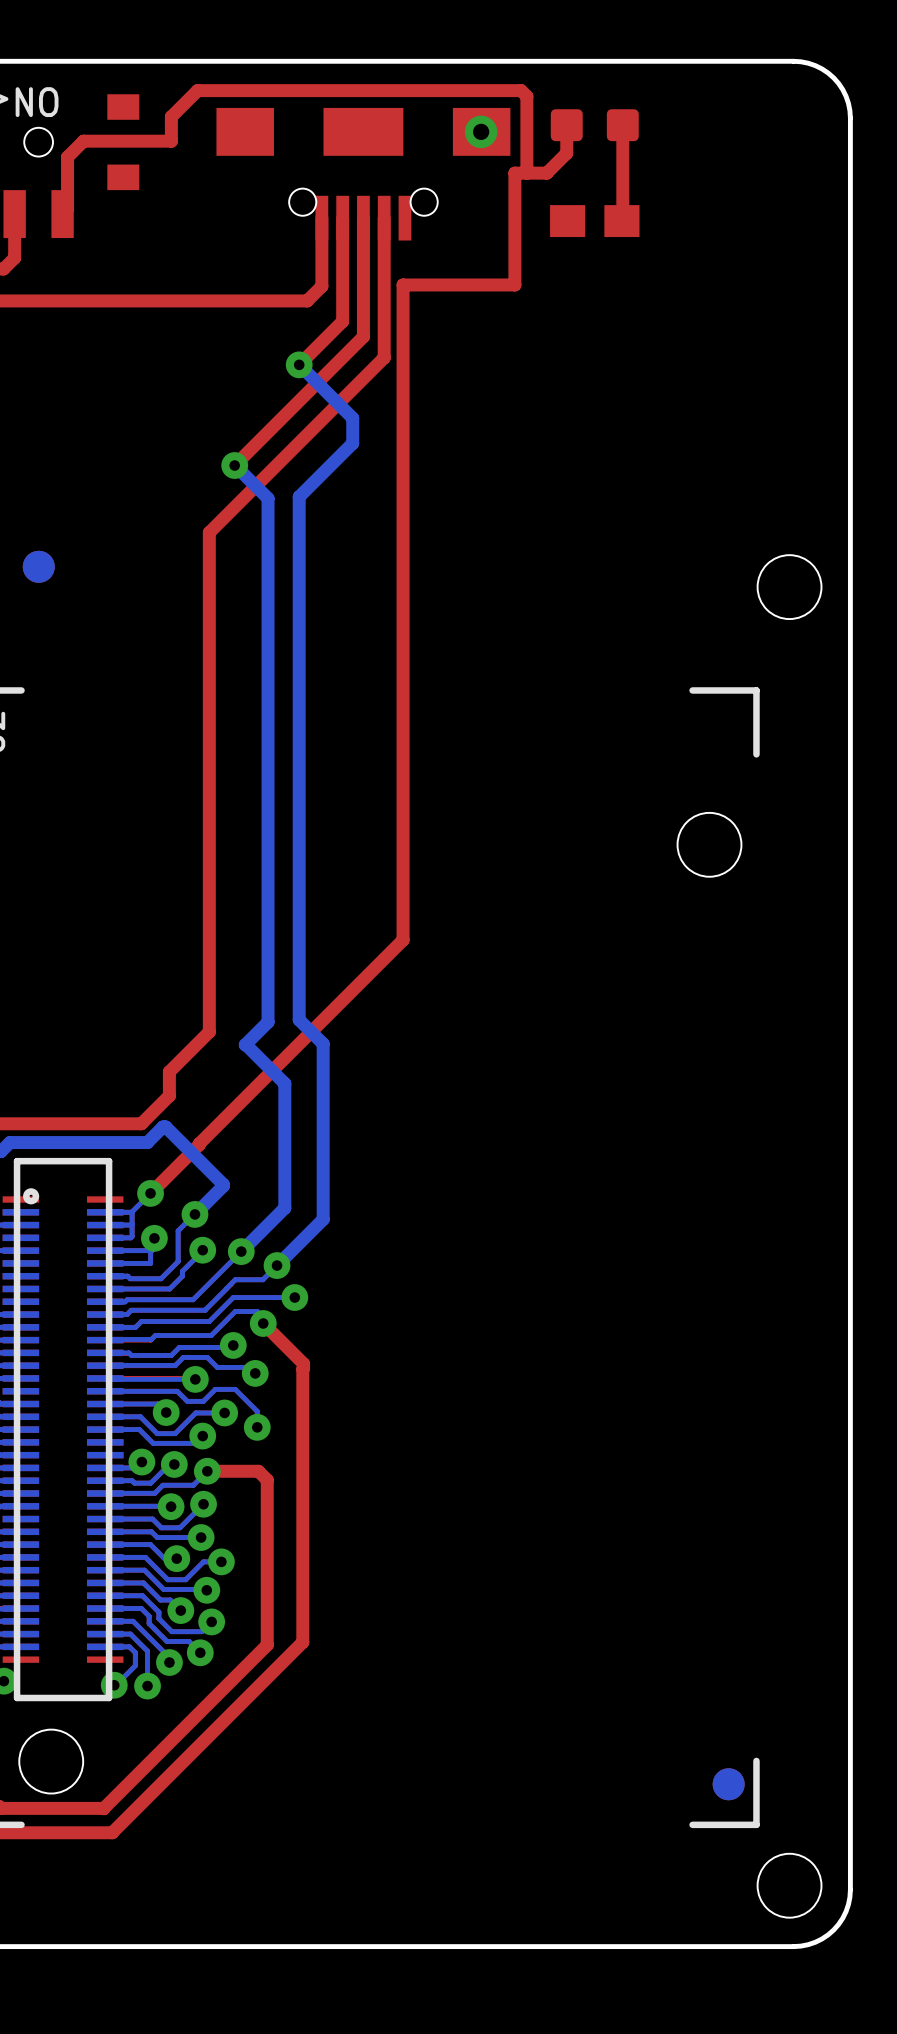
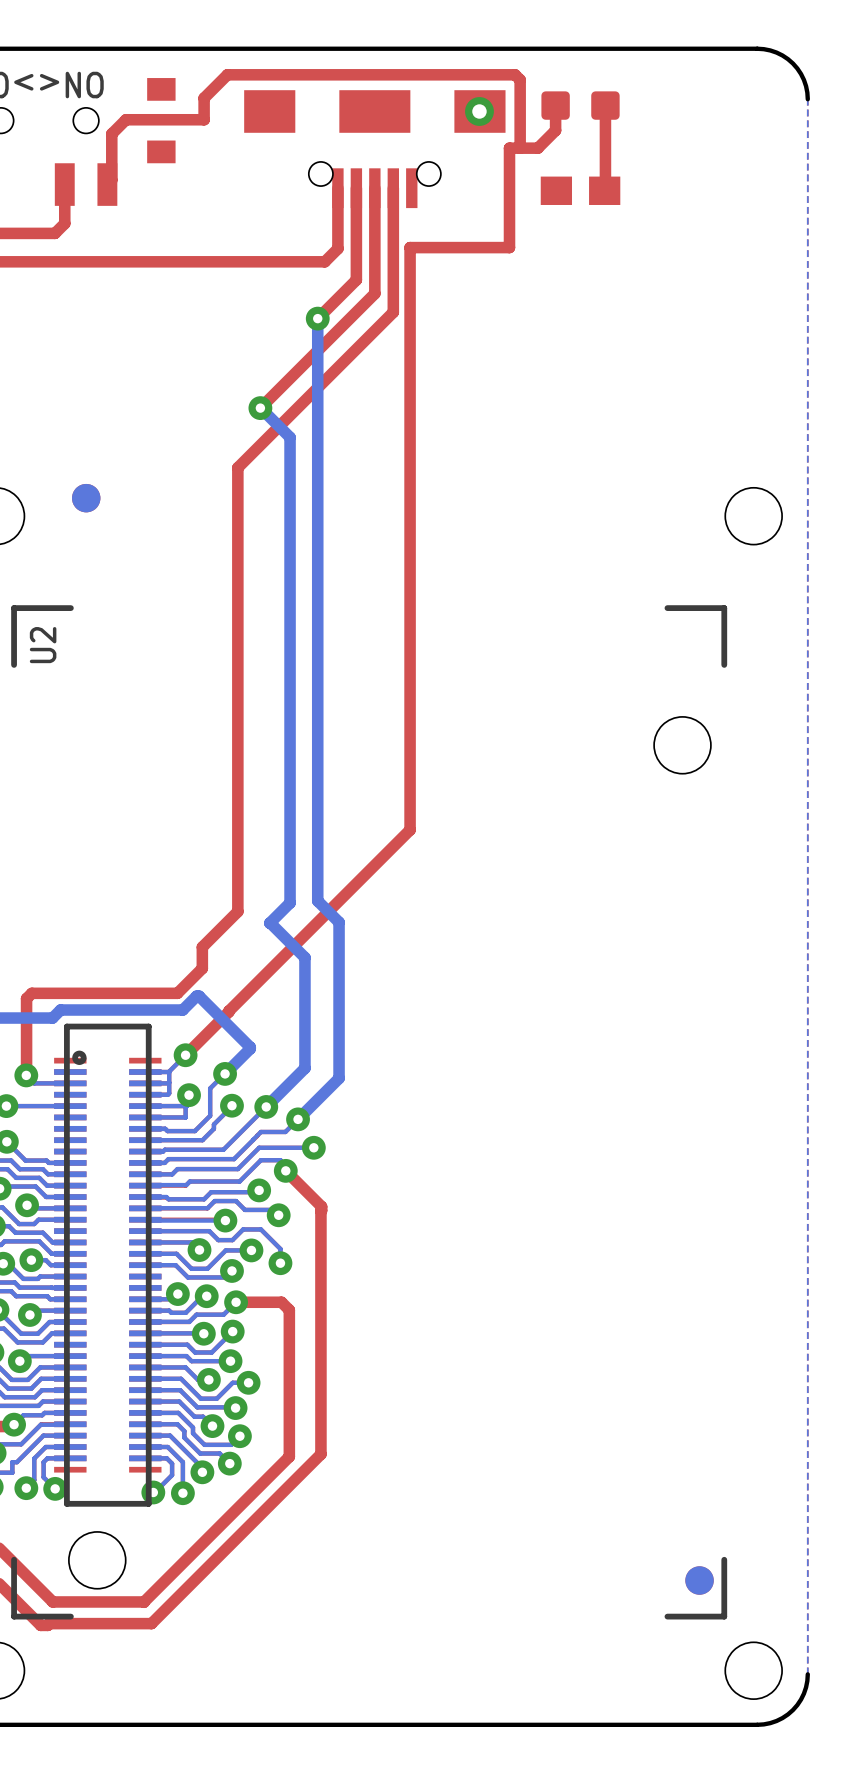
board edge: (850, 118) (850, 1889) -> none
bottom track: (299, 364) (352, 418) (352, 443) (299, 496) -> (317, 318) (317, 435)

